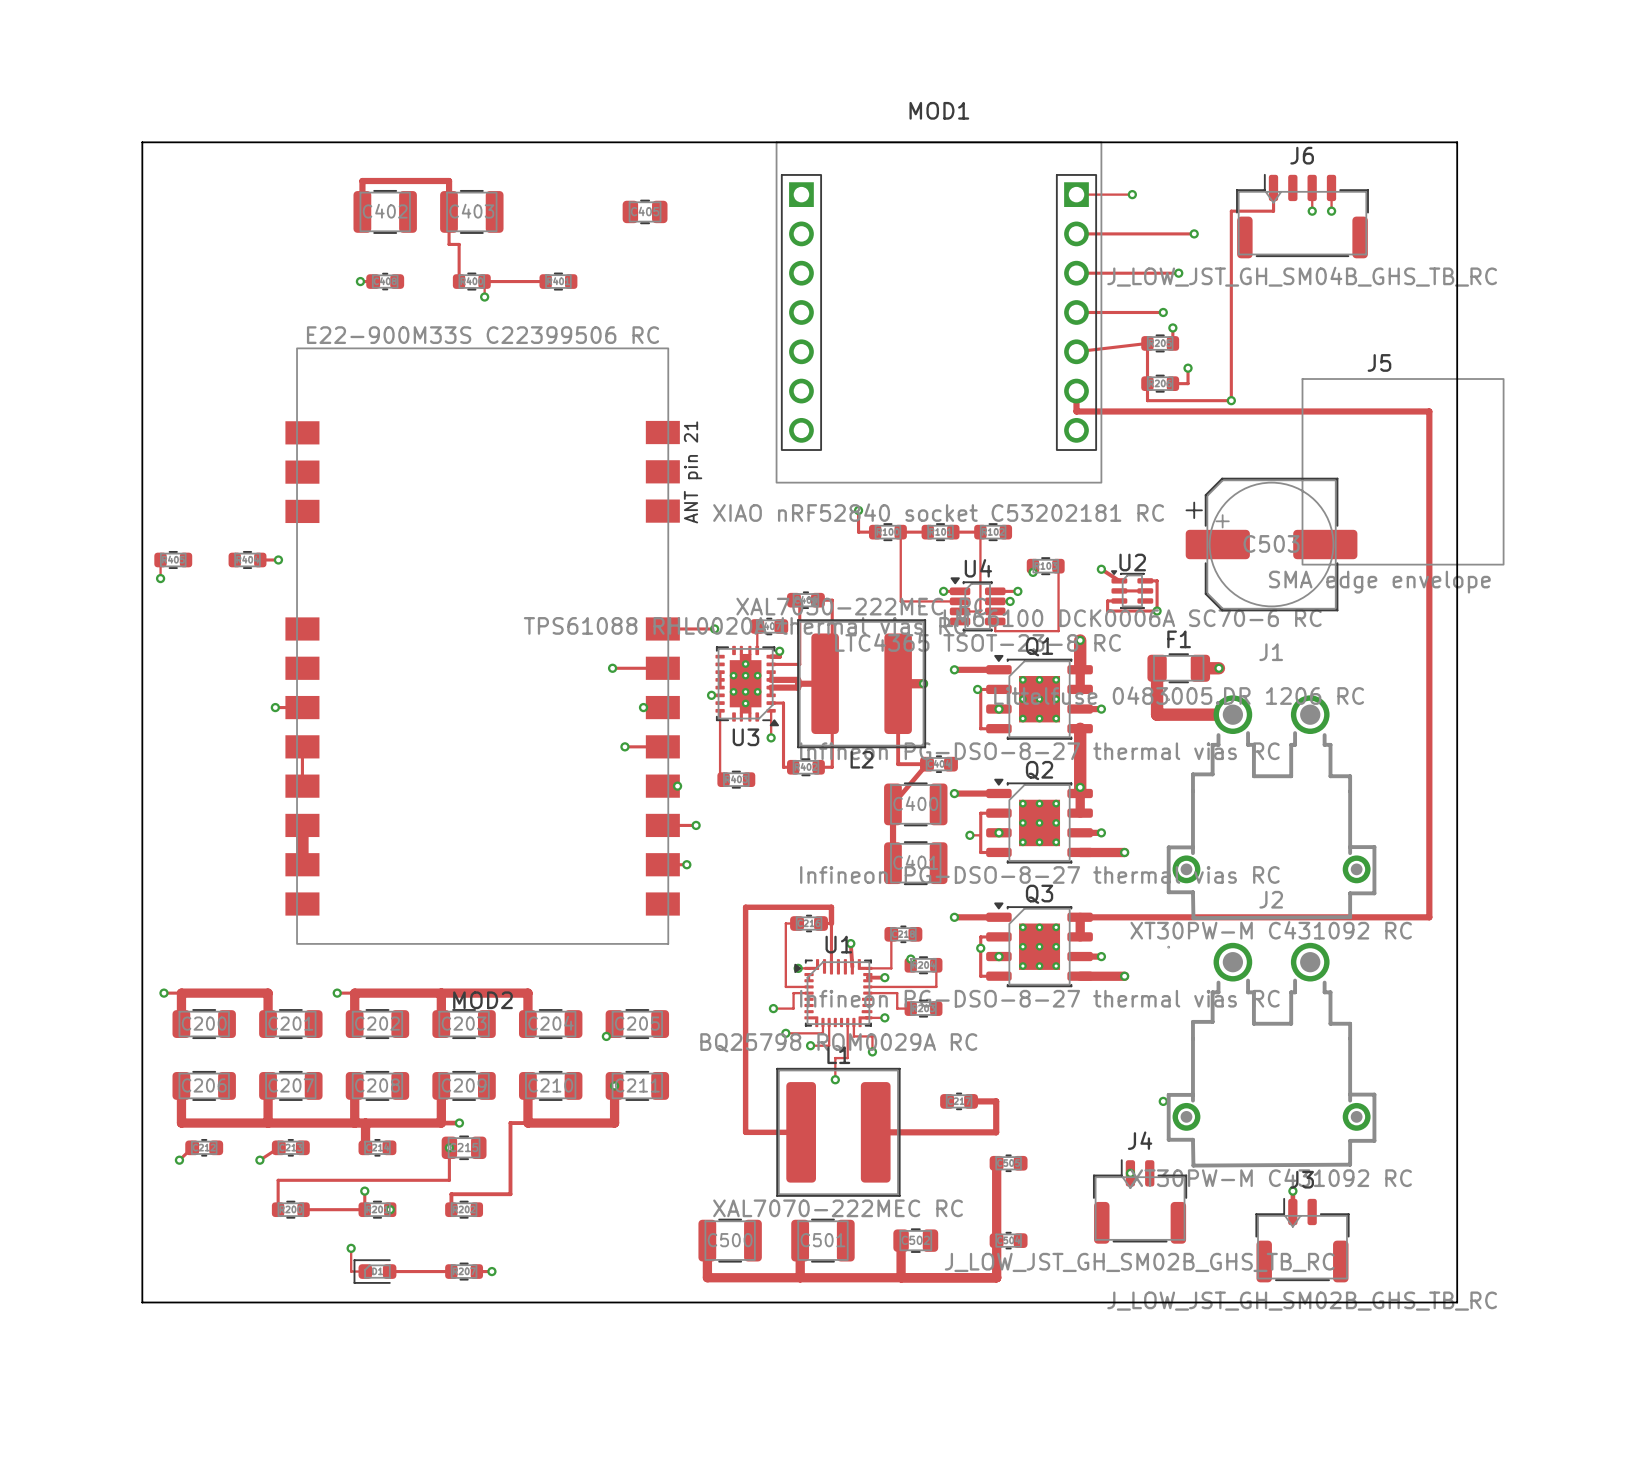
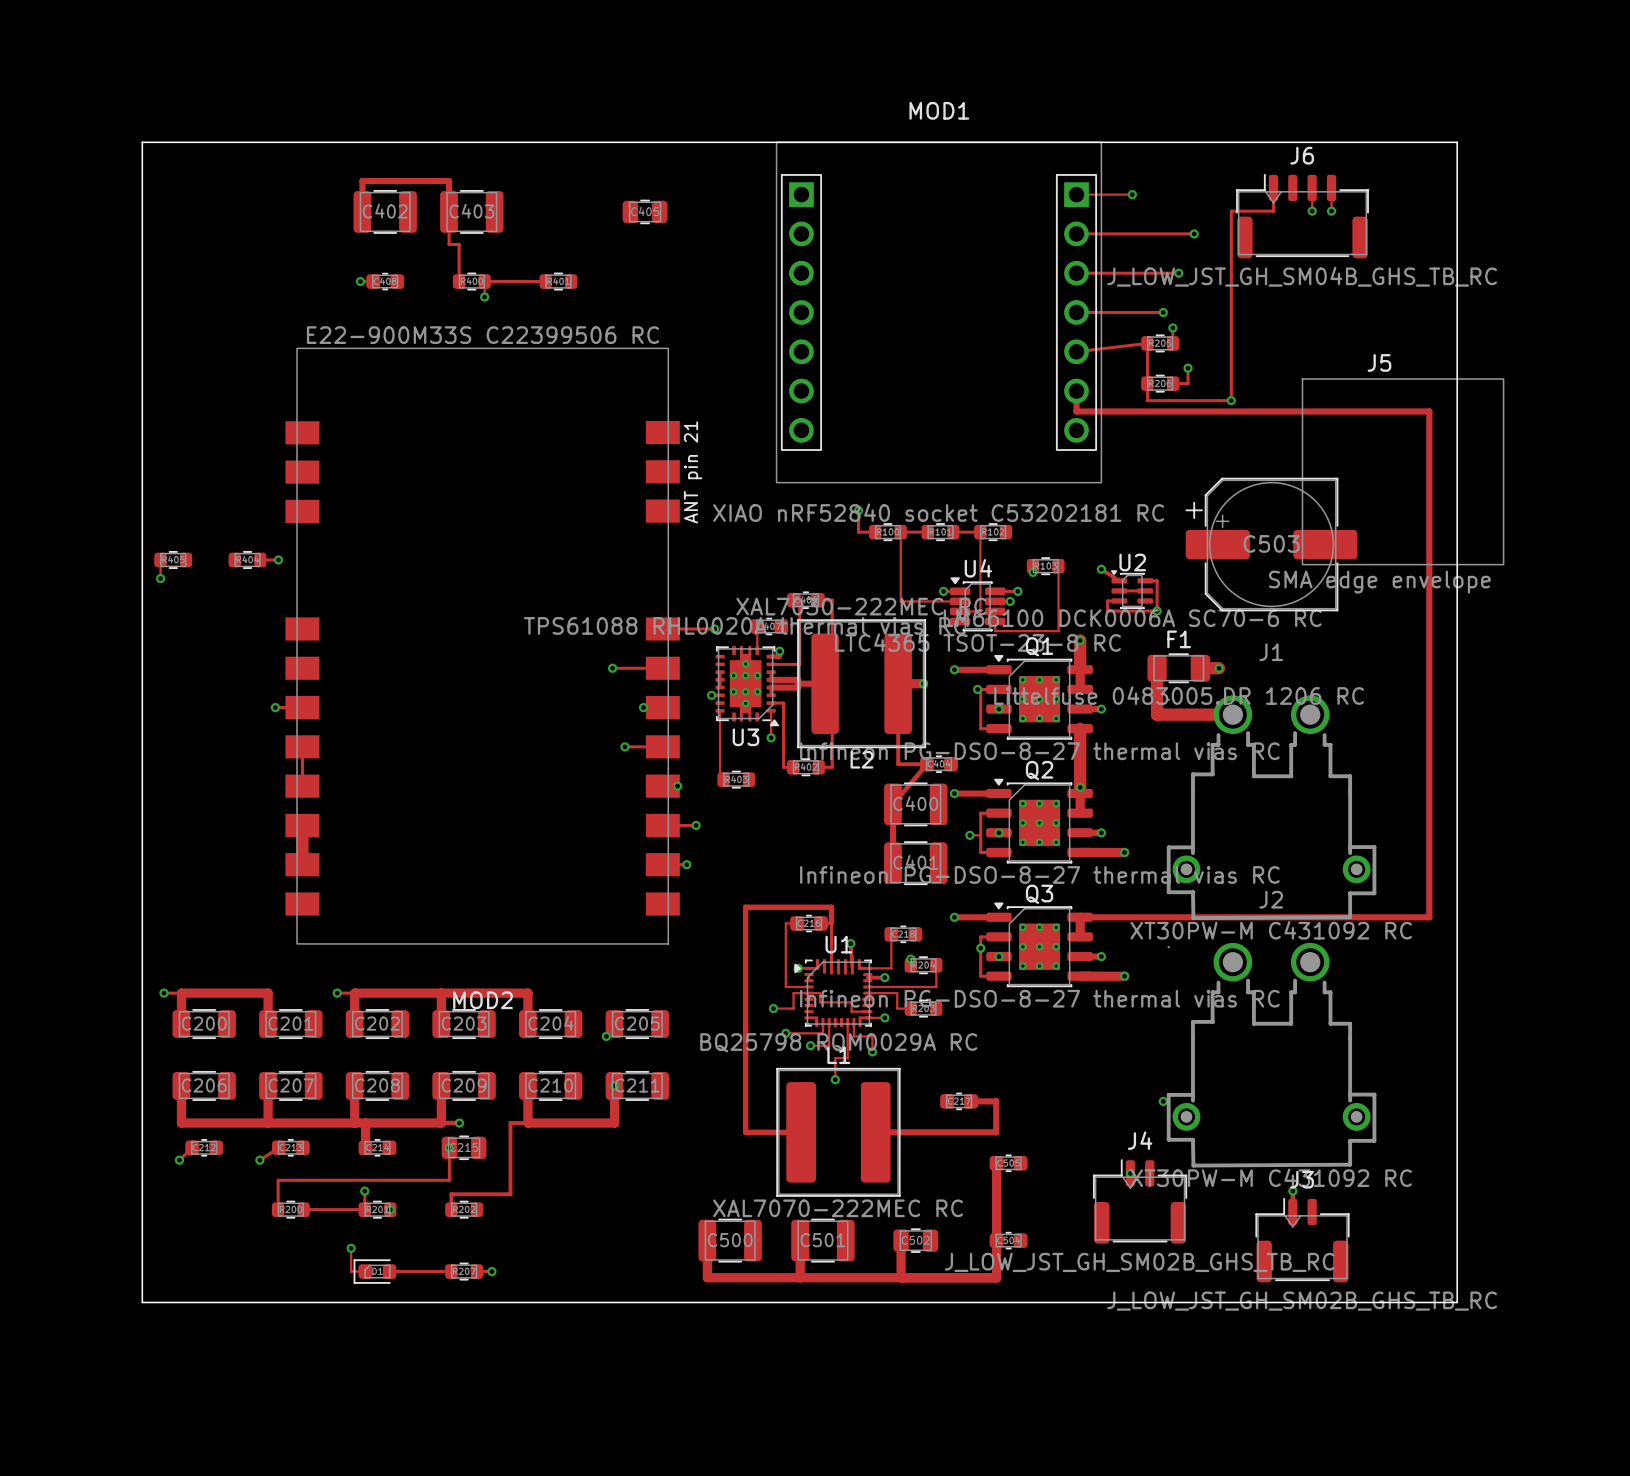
track: none -> (809, 993) (819, 993) (819, 1002) (851, 1002) (851, 1011) (867, 1011)

